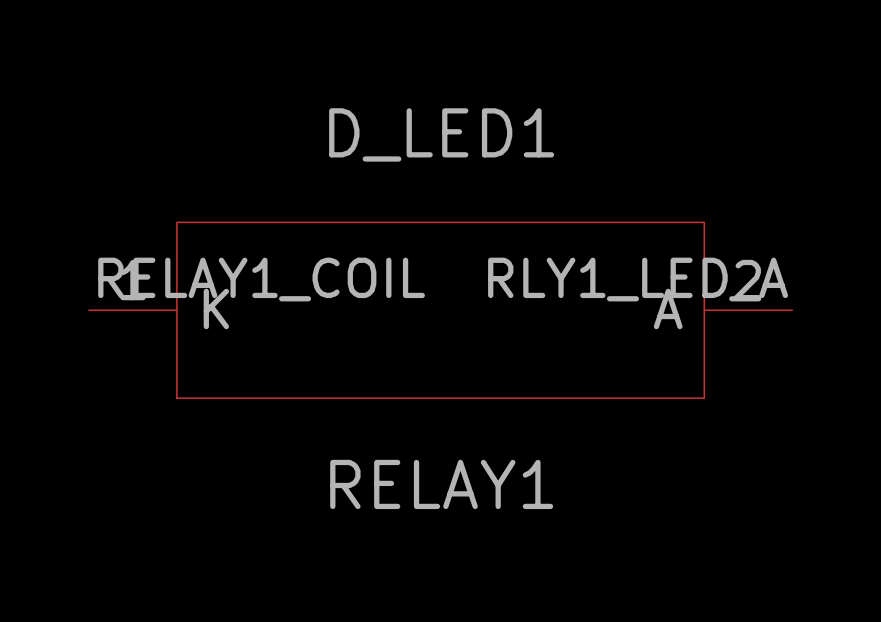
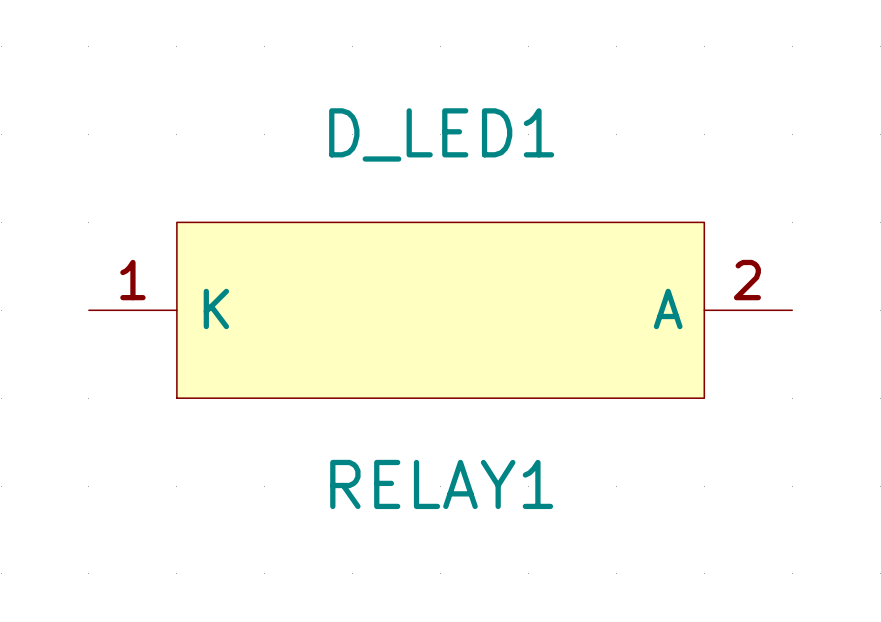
label: RELAY1_COIL (261, 279) -> none
label: RLY1_LED_A (638, 279) -> none

